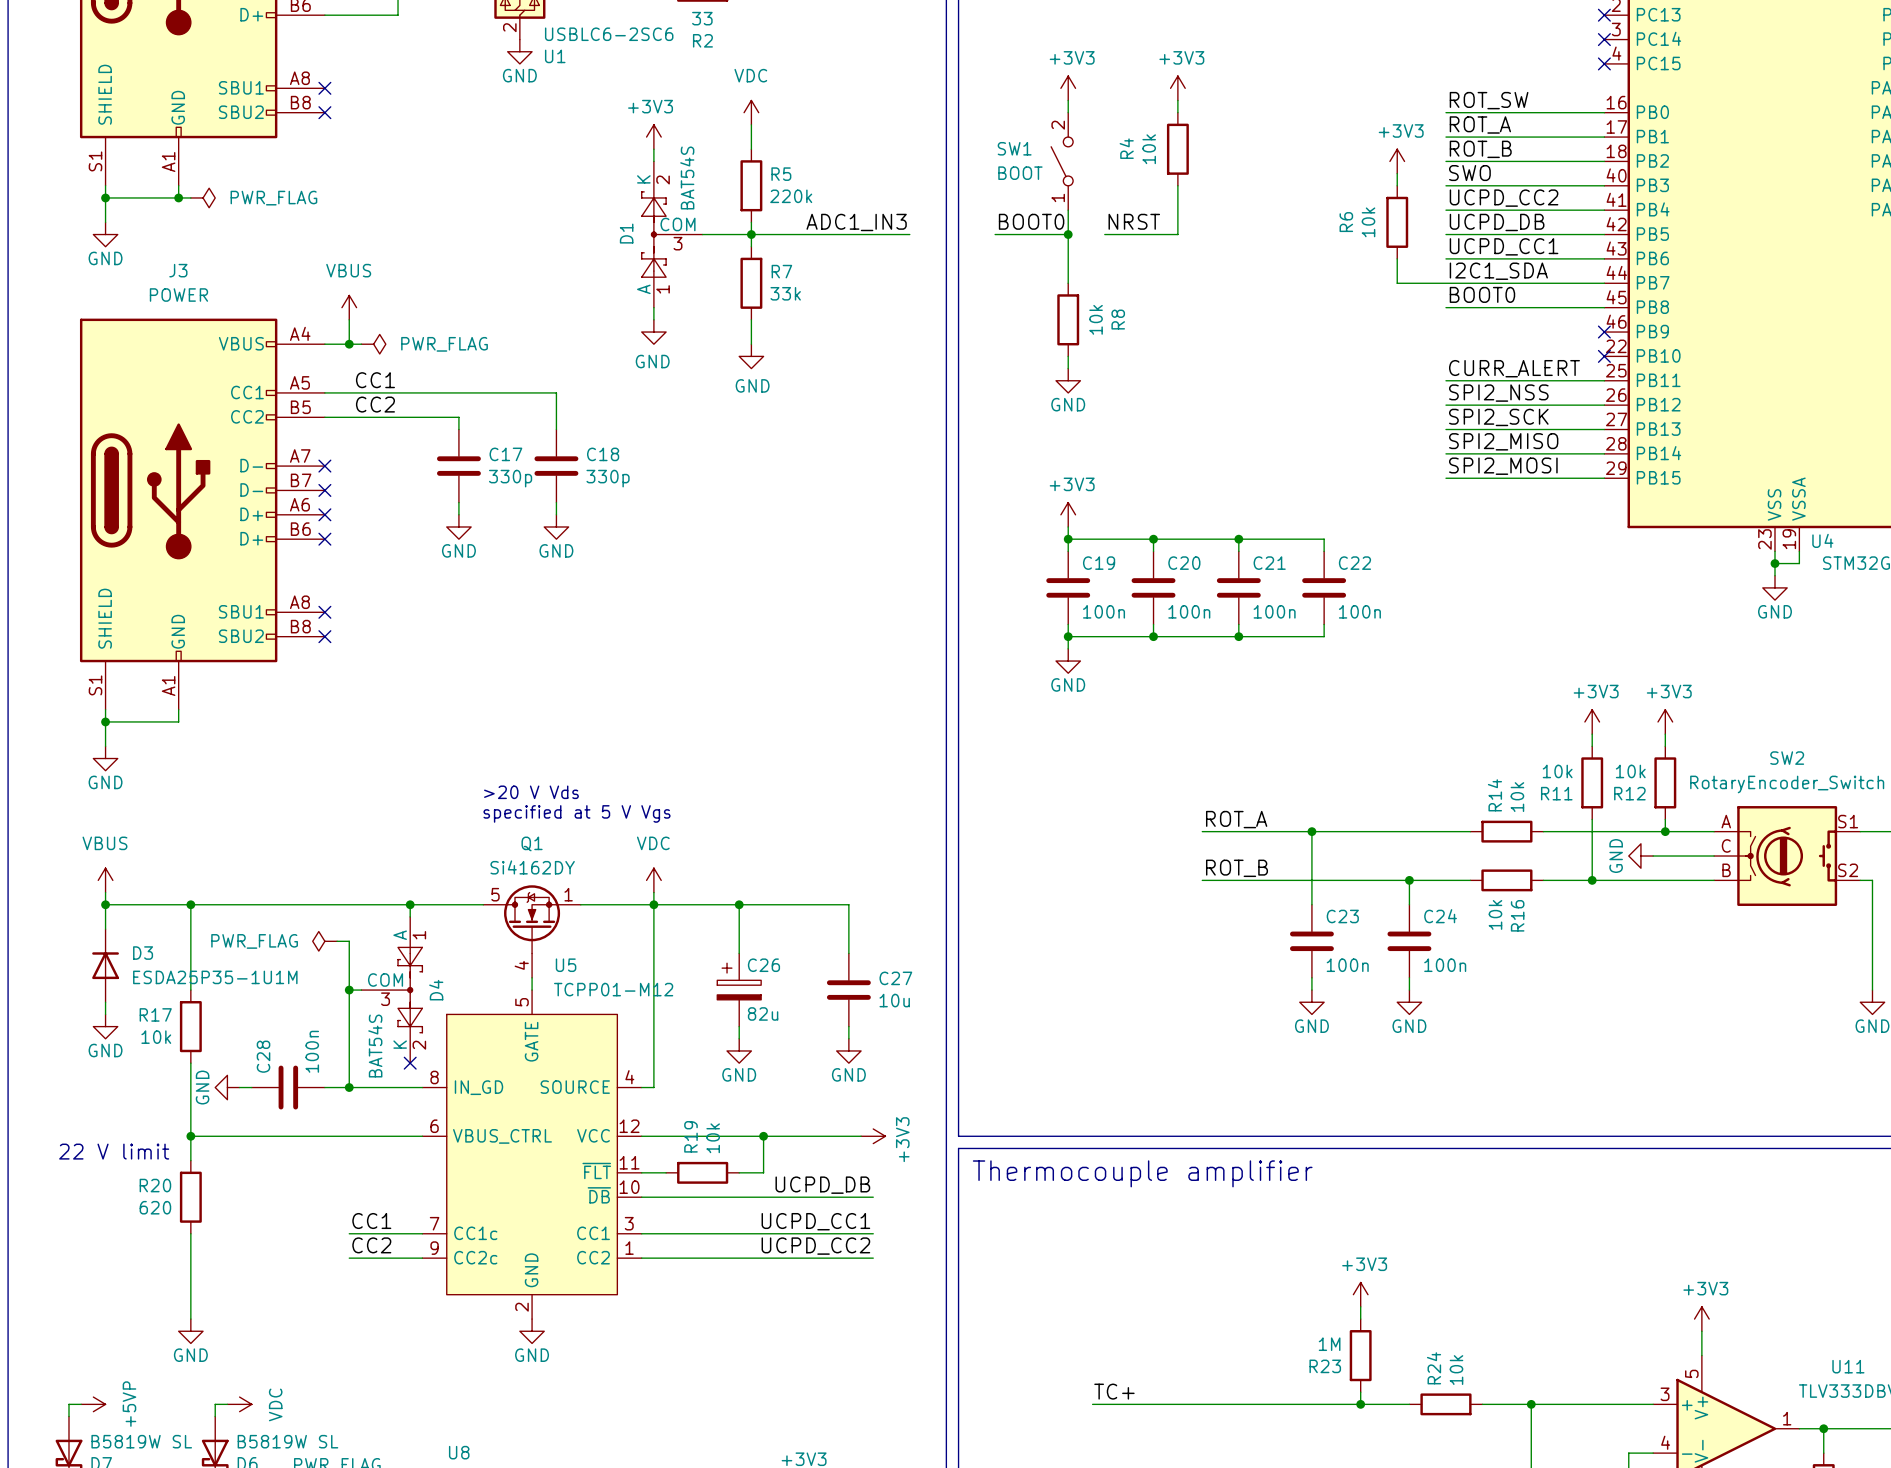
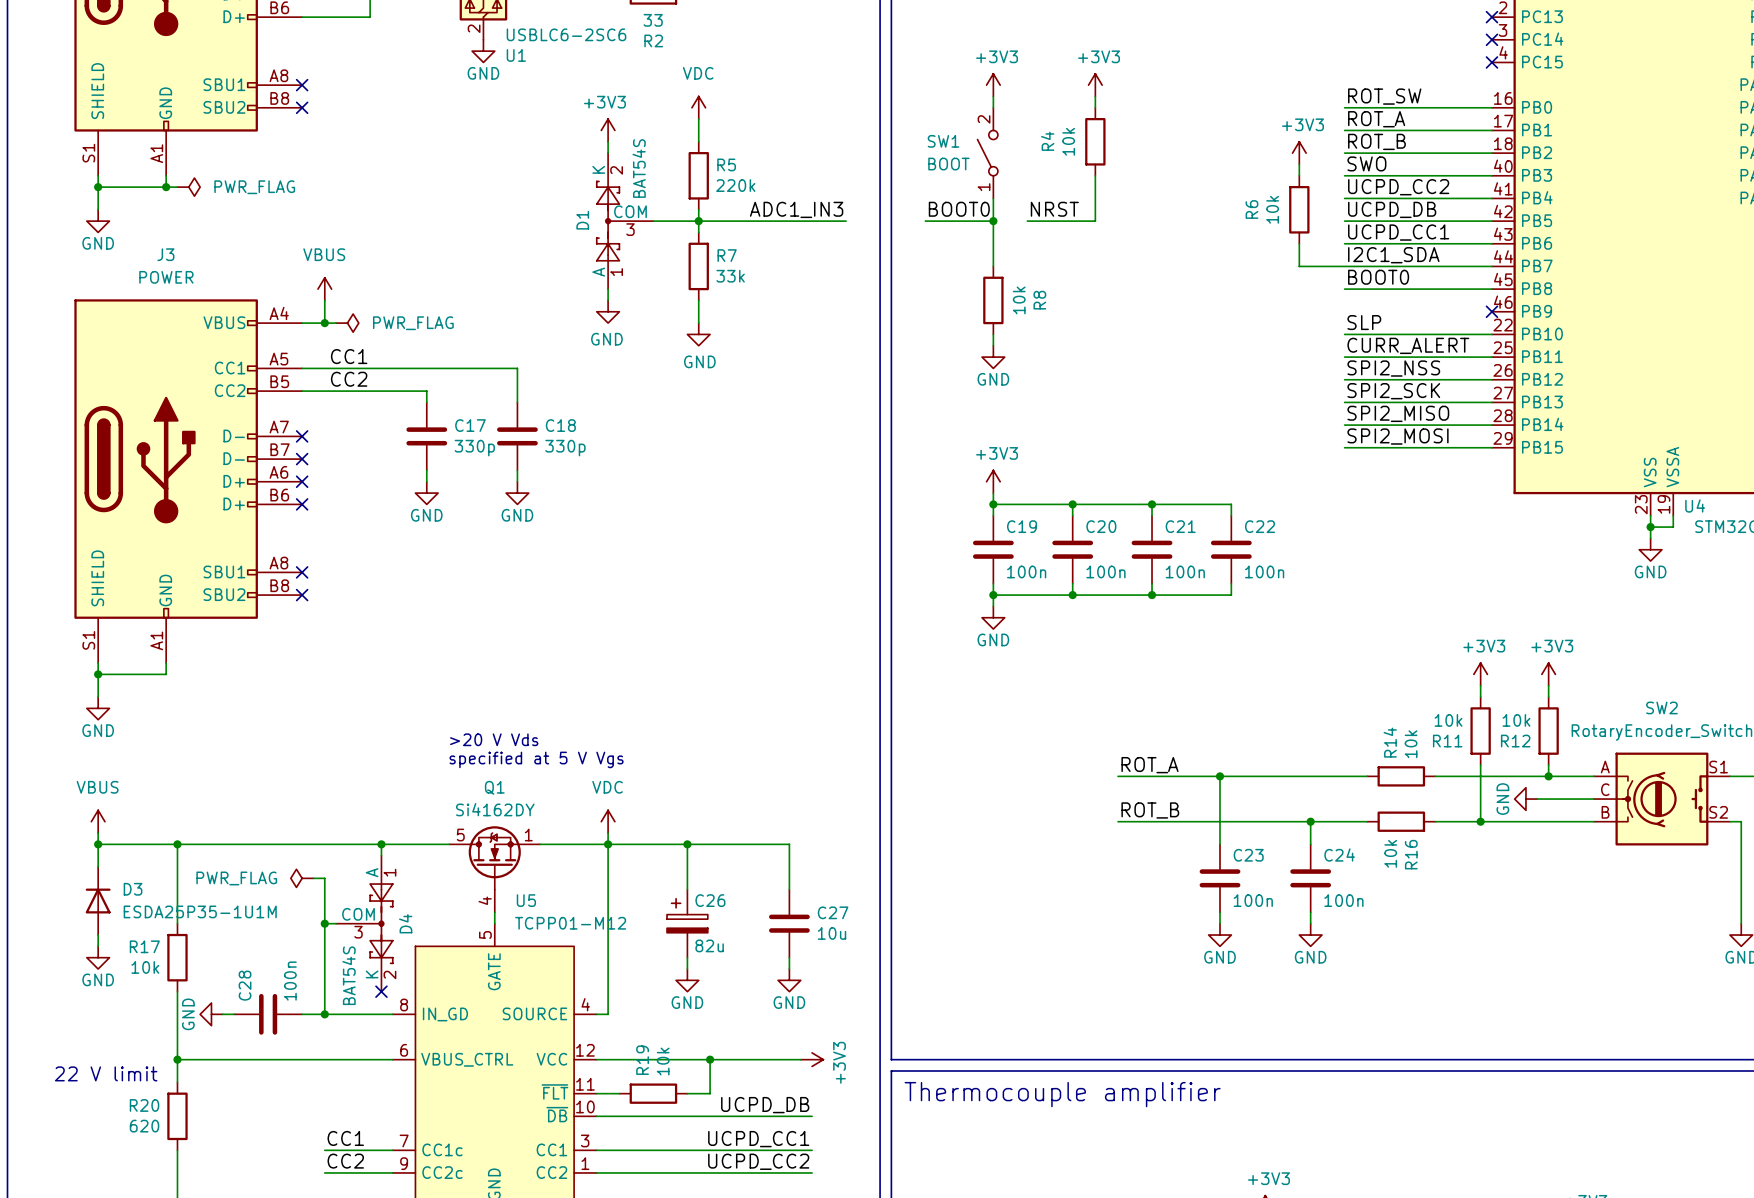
label: none -> SLP (1364, 322)
wire: none -> (1344, 334) (1491, 334)
no-connect mark: (1604, 356) -> none

